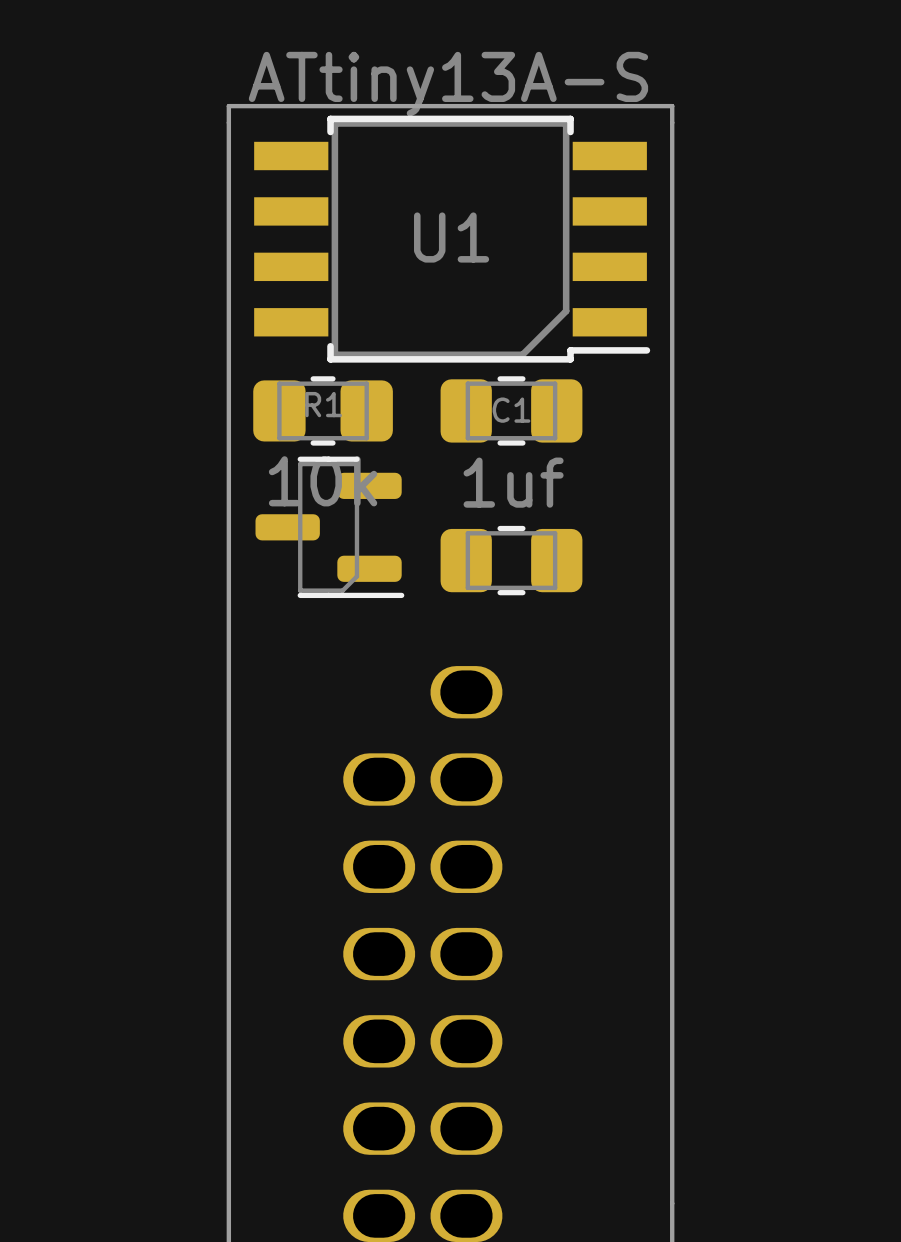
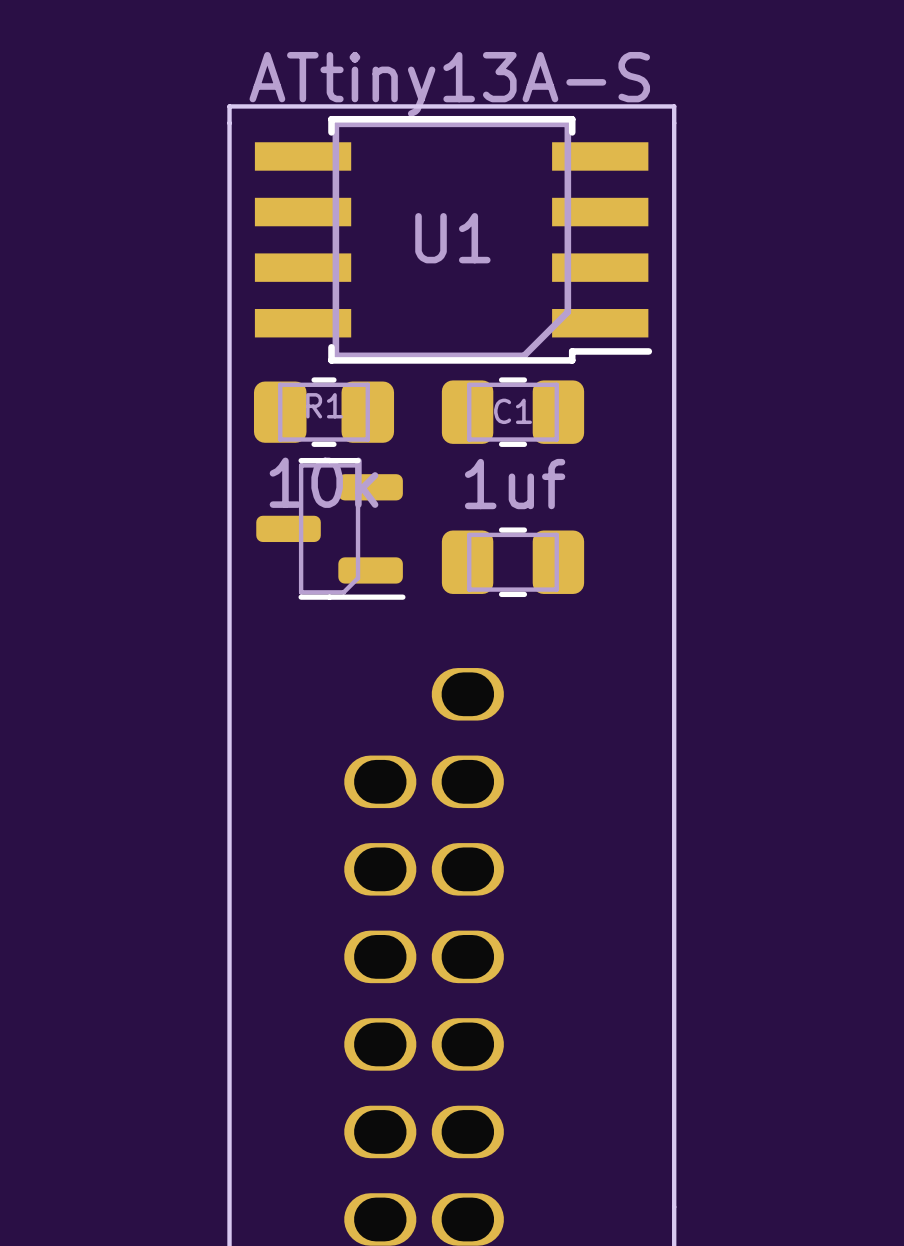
U1 footprint: [254, 115, 651, 363] -> [254, 115, 653, 364]

